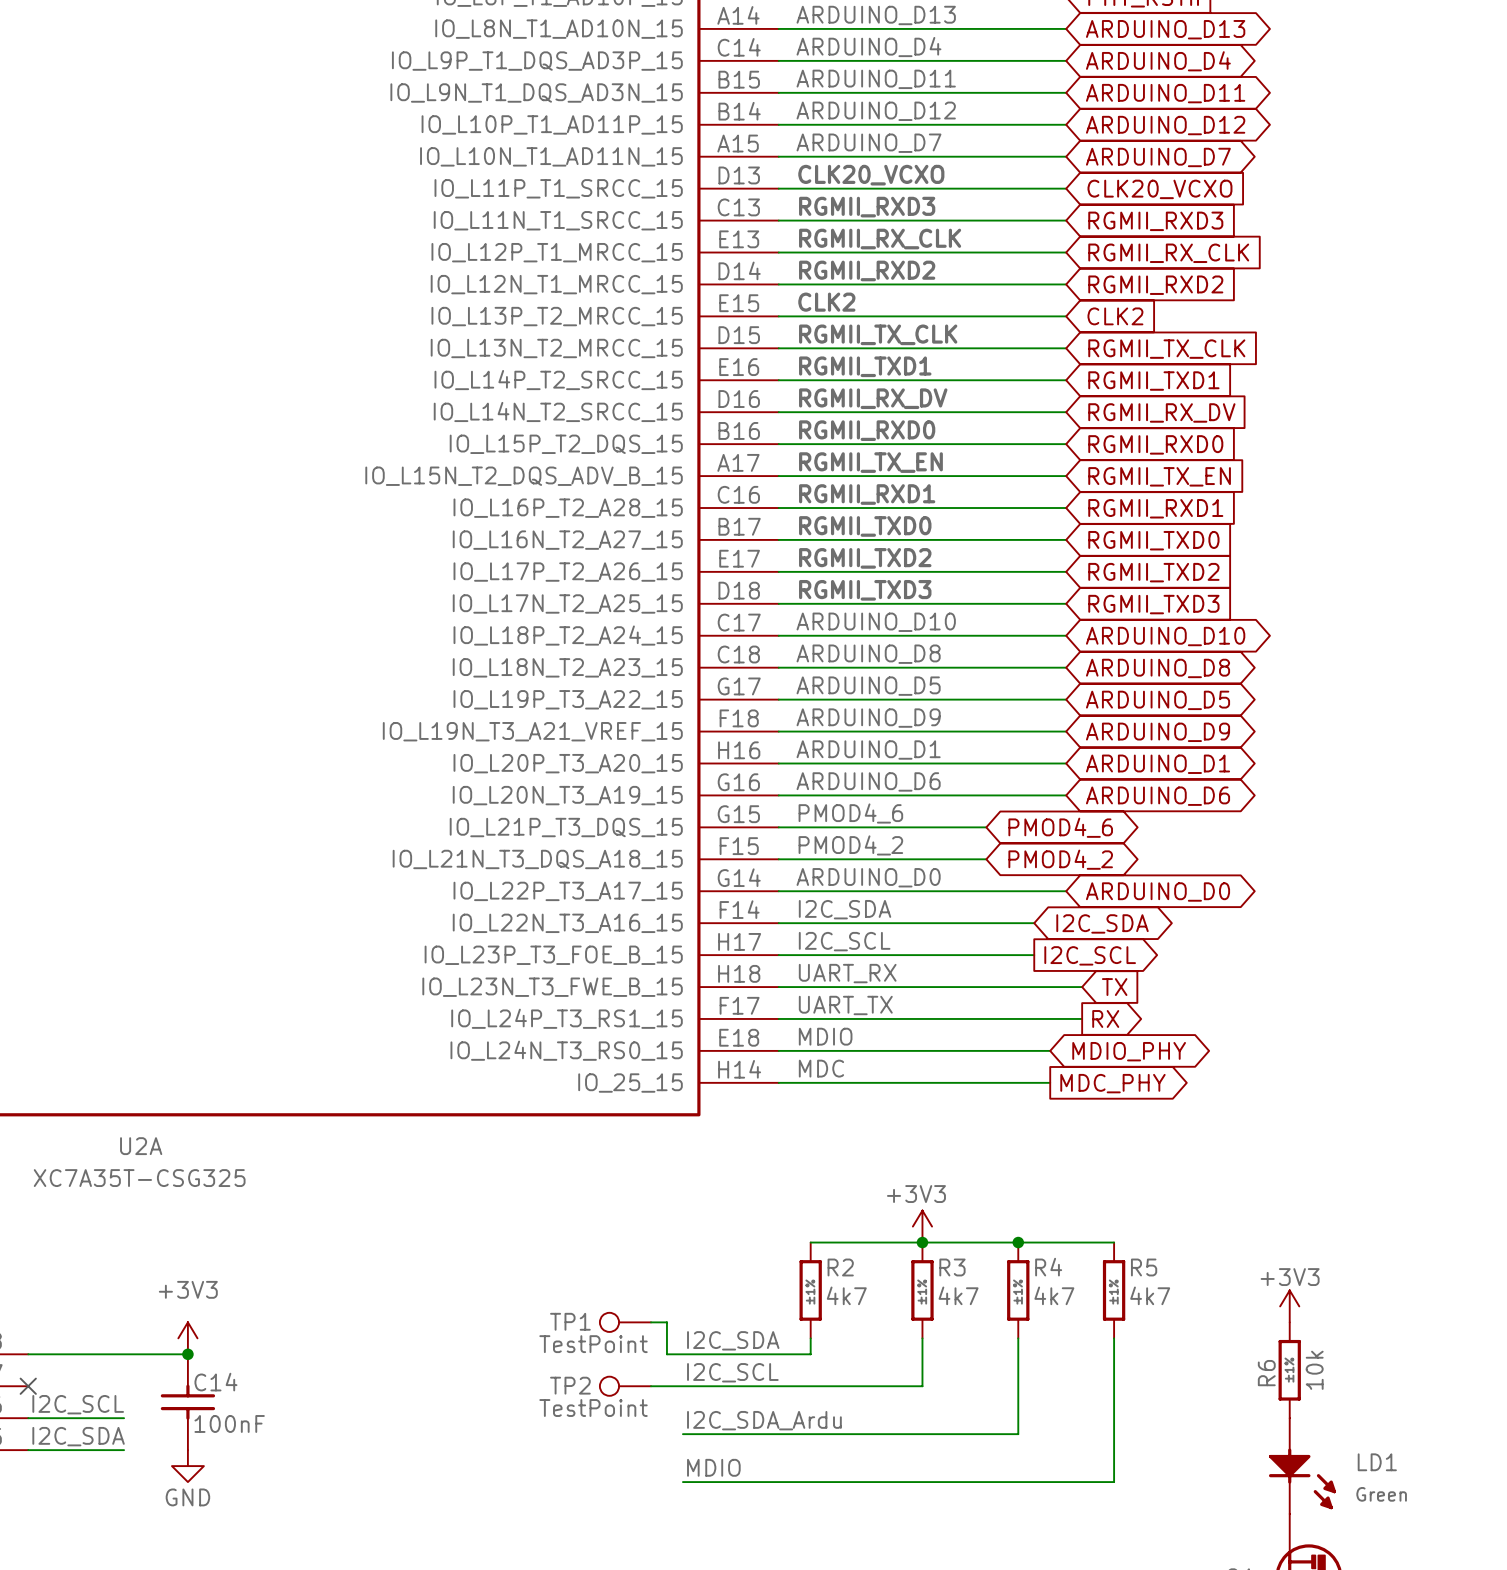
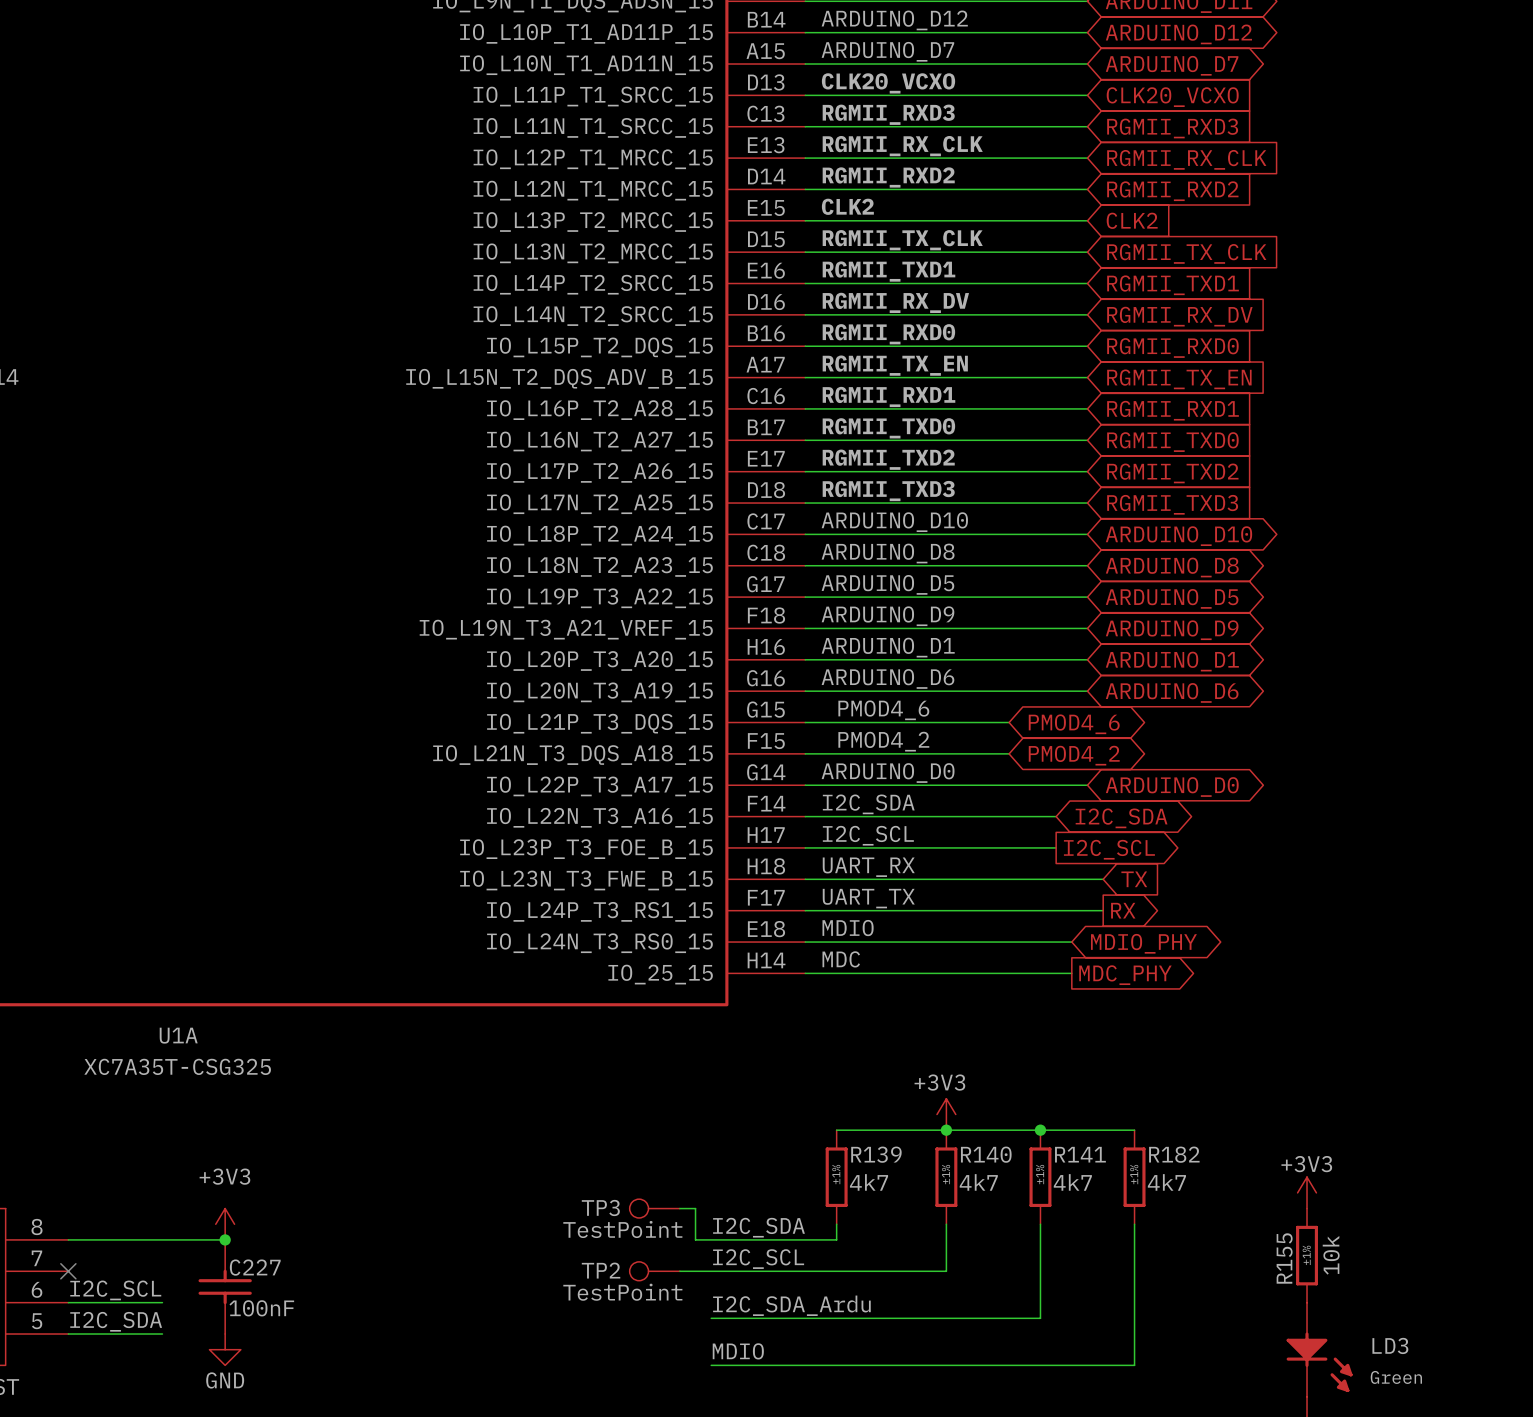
U2A name: U2A (141, 1146) -> U1A (178, 1035)
R2 name: R2 (840, 1267) -> R139 (876, 1154)
R3 name: R3 (952, 1267) -> R140 (986, 1154)
R4 name: R4 (1048, 1267) -> R141 (1080, 1154)
R5 name: R5 (1144, 1267) -> R182 (1174, 1154)
TP1 name: TP1 (570, 1321) -> TP3 (600, 1207)
R6 name: R6 (1266, 1373) -> R155 (1284, 1258)
C14 name: C14 (215, 1382) -> C227 (255, 1267)
LD1 name: LD1 (1377, 1462) -> LD3 (1390, 1345)

